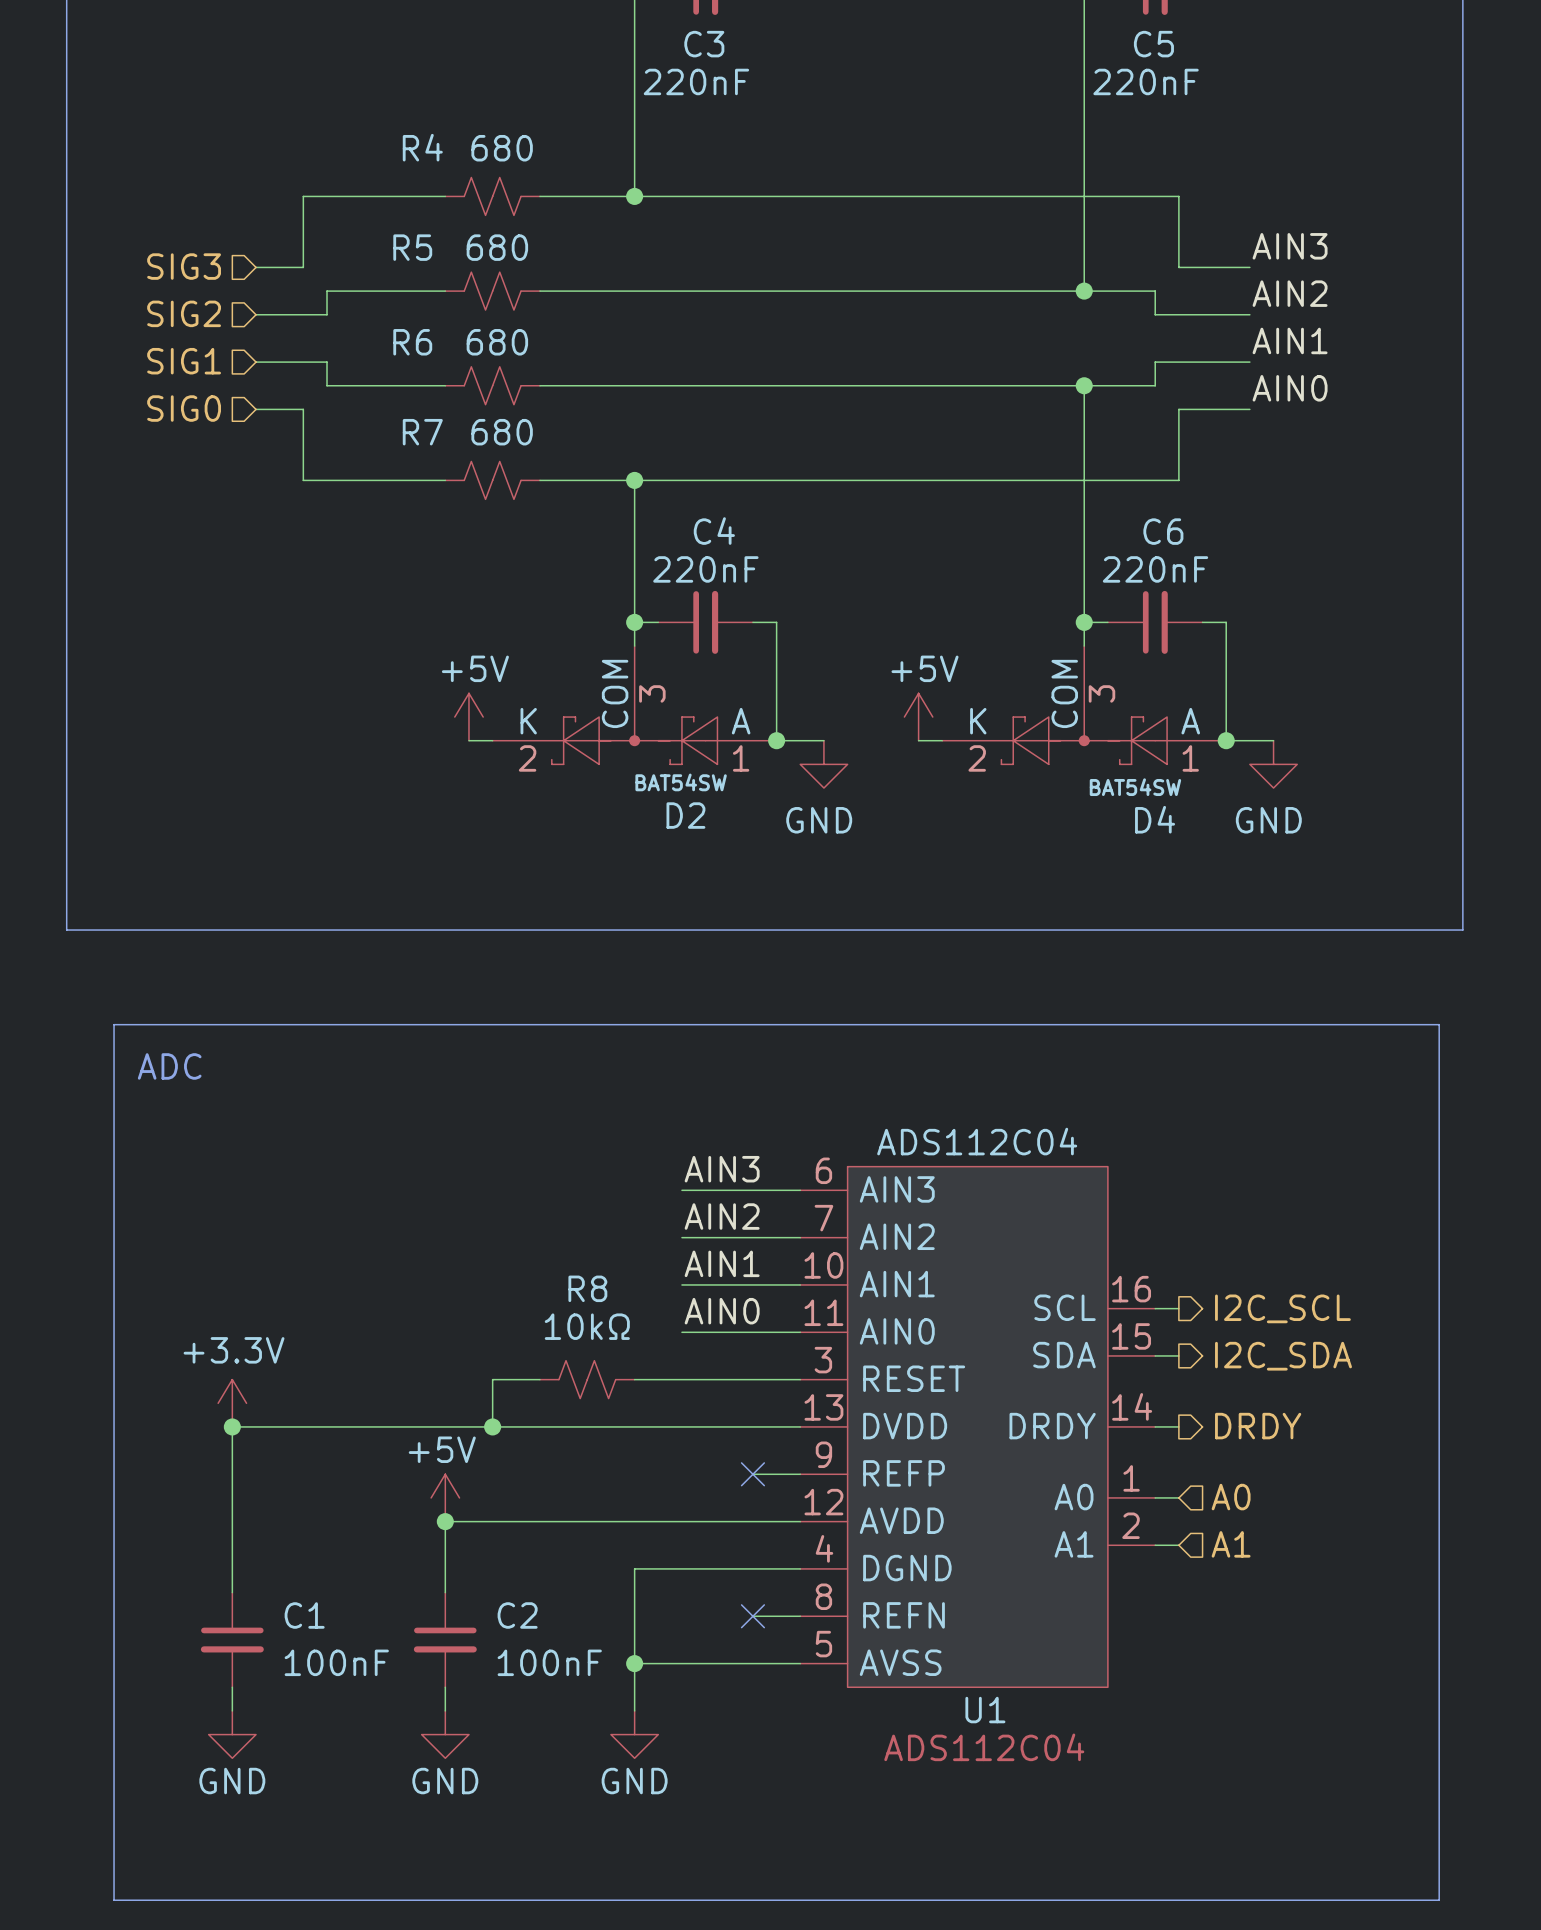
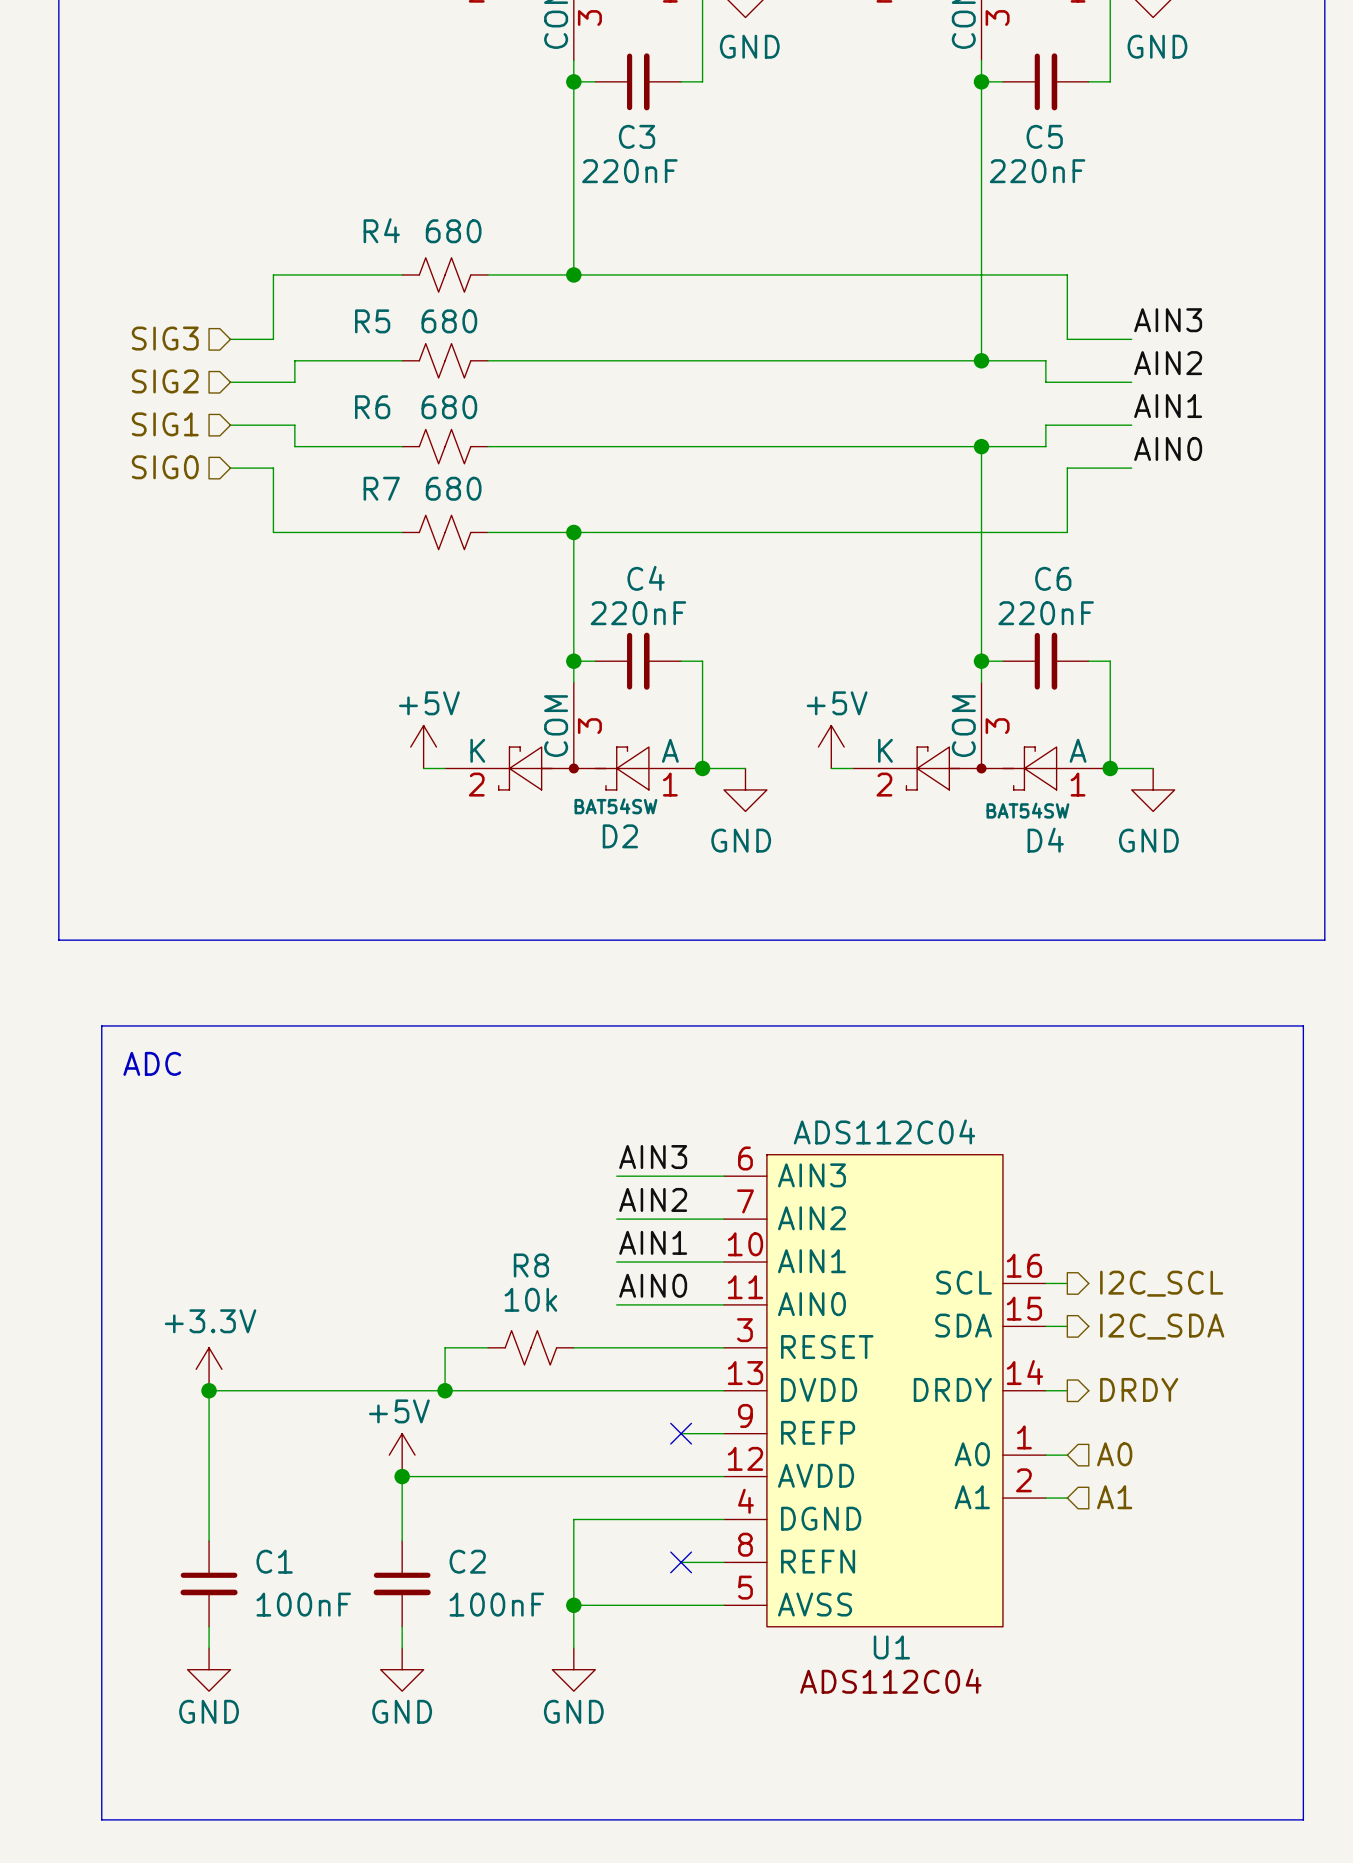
R8 value: 10kΩ (587, 1326) -> 10k (530, 1299)

